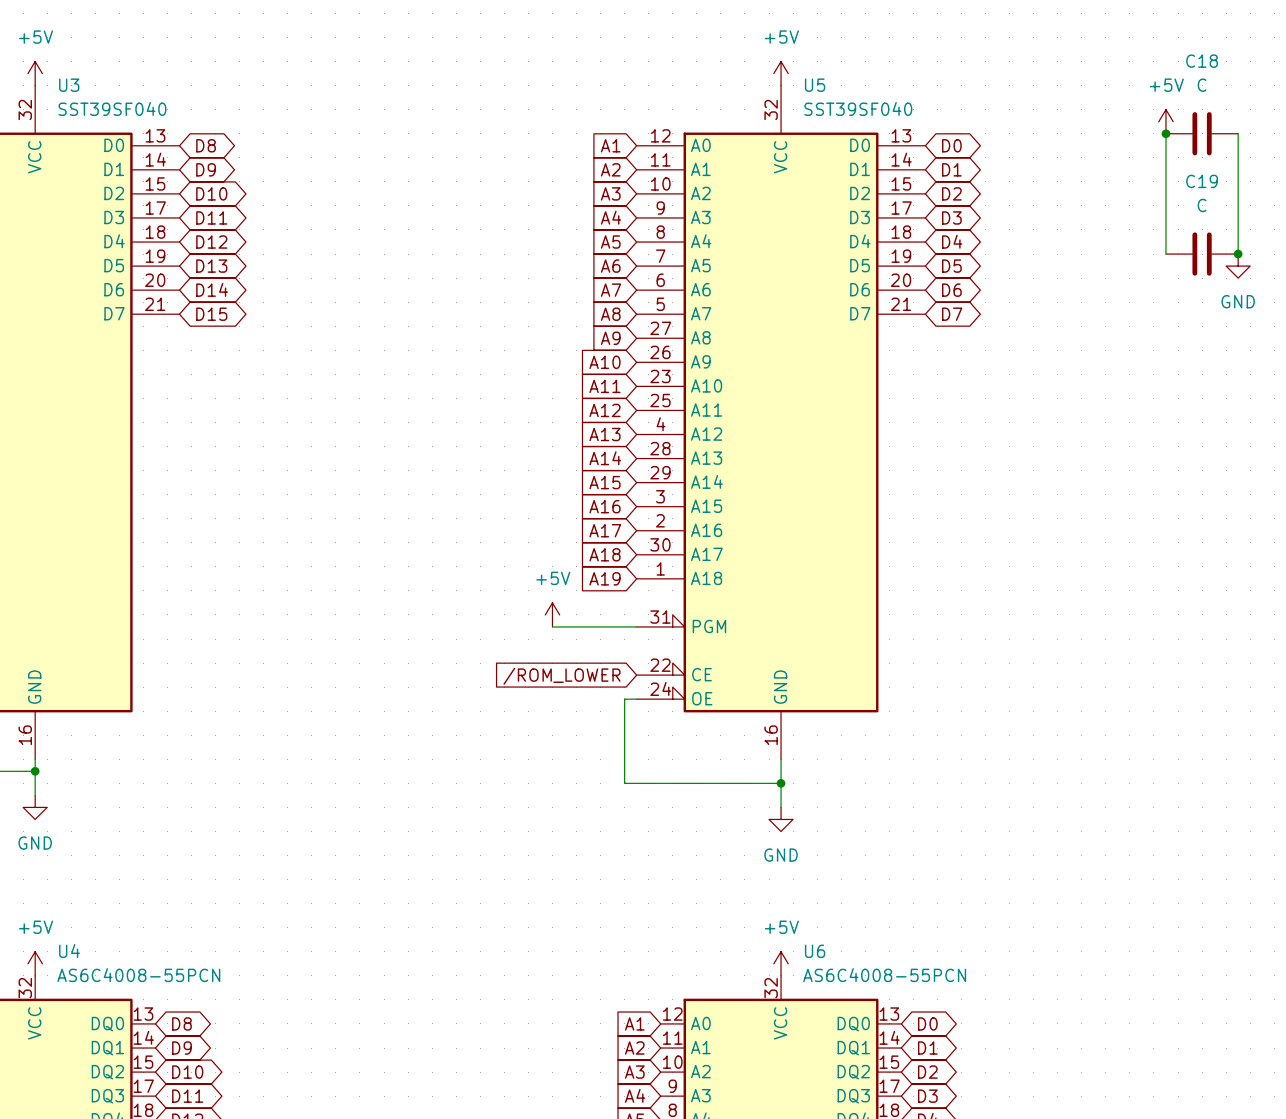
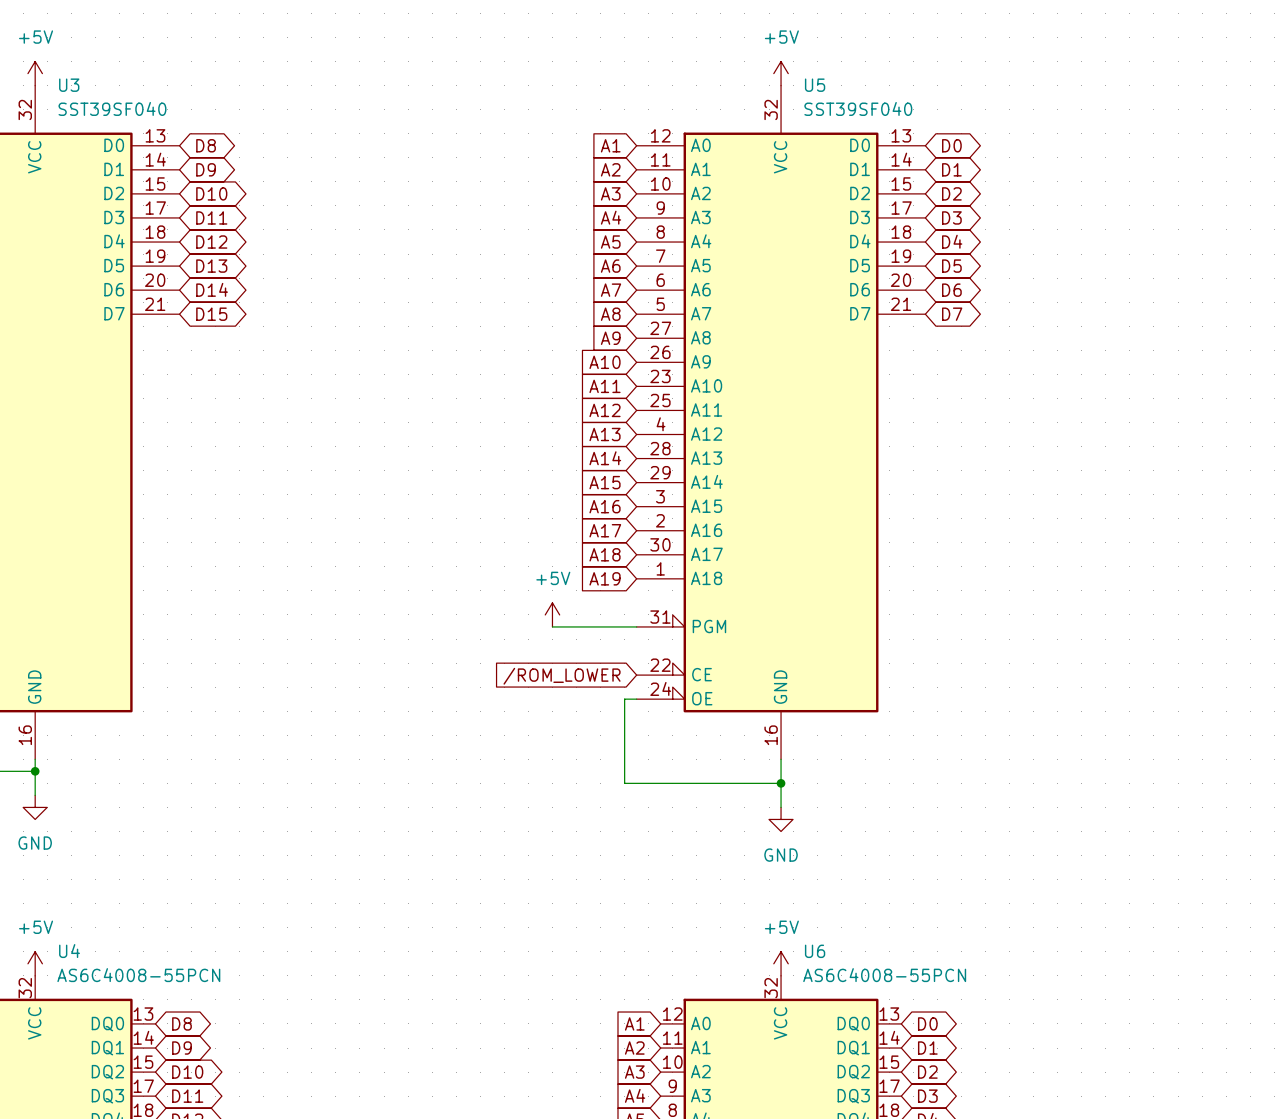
power symbol: +5V (1165, 121) -> none
wire: (1165, 133) (1165, 254) -> none
junction: (1165, 133) -> none
C18: C (1202, 133) -> none
wire: (1238, 133) (1238, 254) -> none
C19: C (1202, 254) -> none
junction: (1238, 254) -> none
power symbol: GND (1238, 266) -> none

